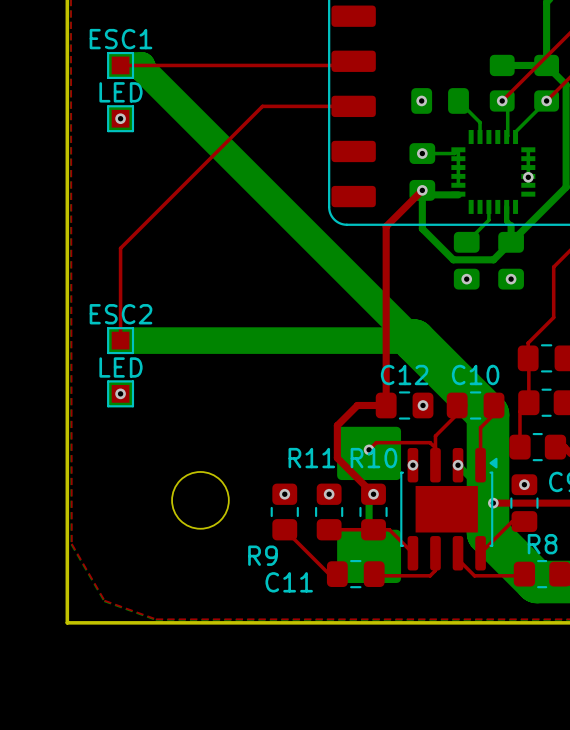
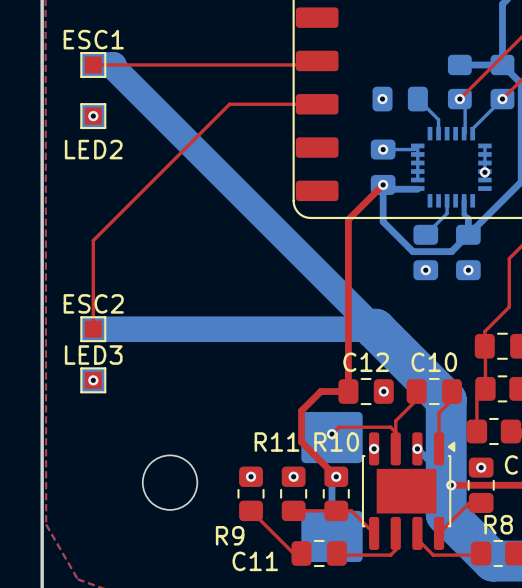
LED name: LED (120, 92) -> LED2 (93, 149)
LED name: LED (120, 367) -> LED3 (93, 355)

